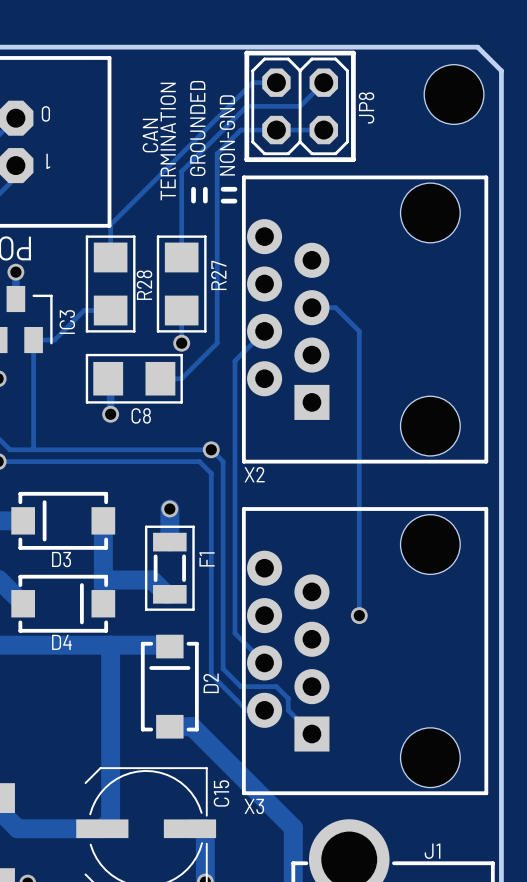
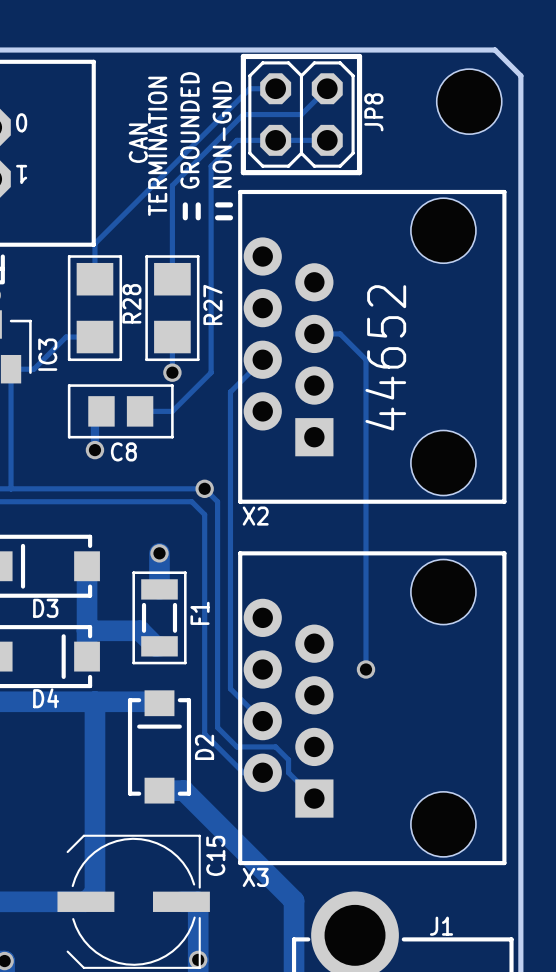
text: none -> 44652 (385, 357)
C8 footprint: [93, 361, 176, 396] -> [88, 396, 154, 427]

